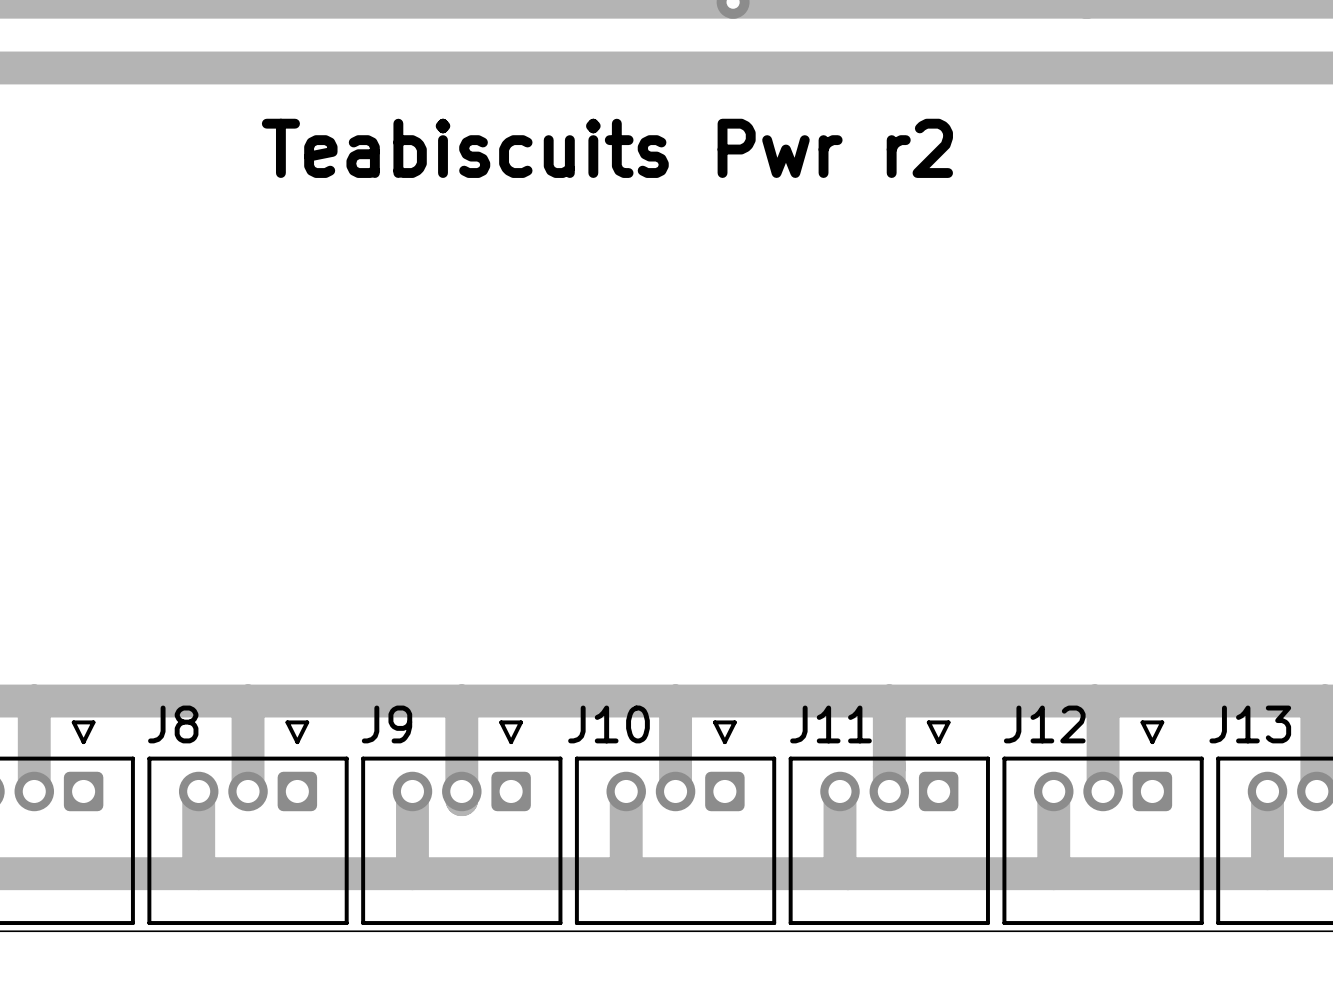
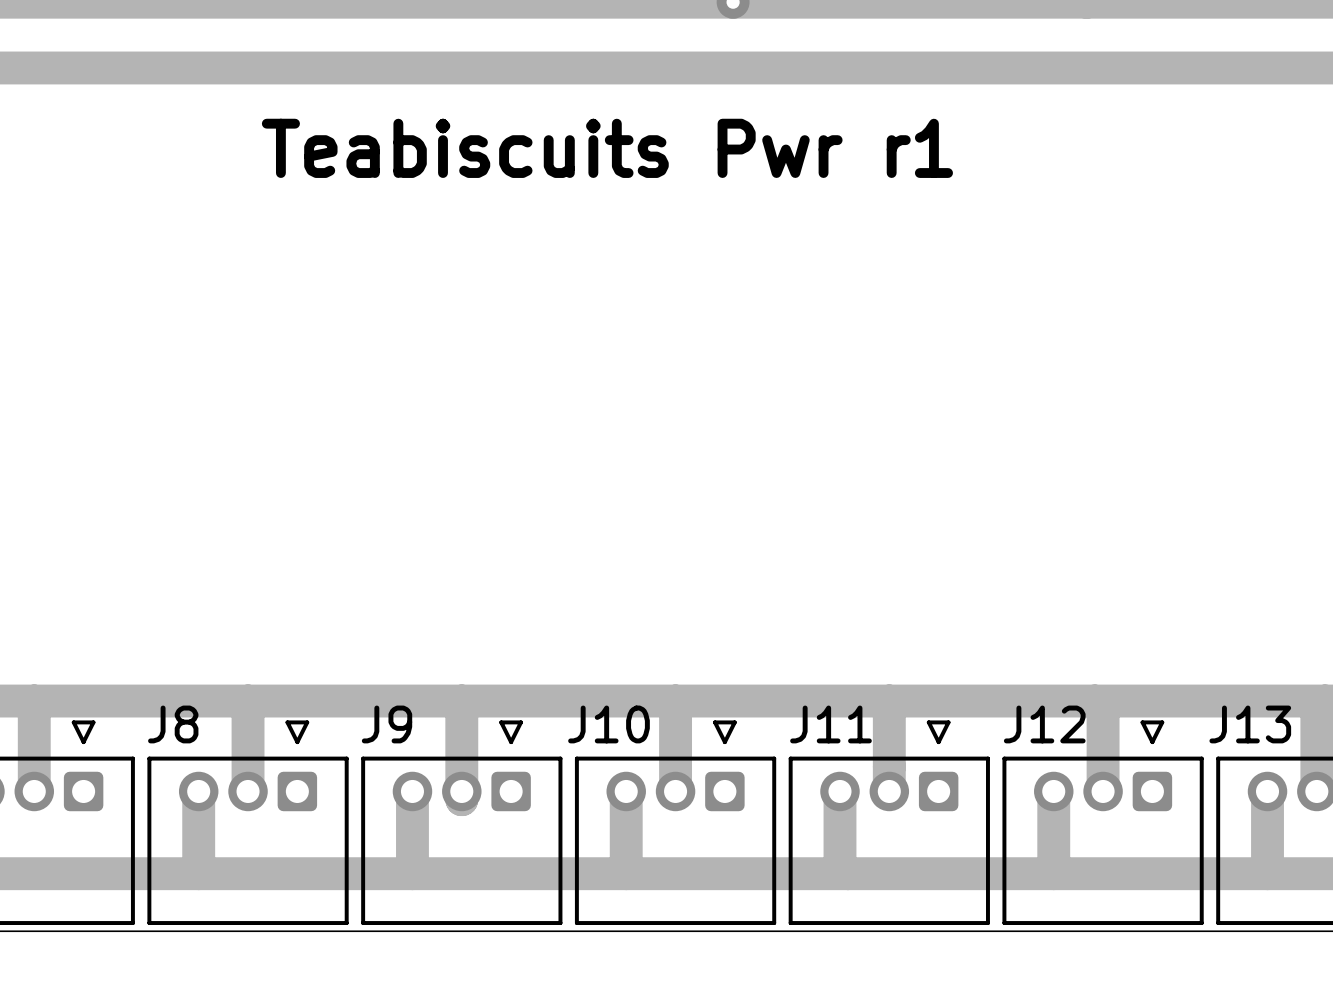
text: Teabiscuits Pwr r2 (607, 148) -> Teabiscuits Pwr r1 (607, 148)

